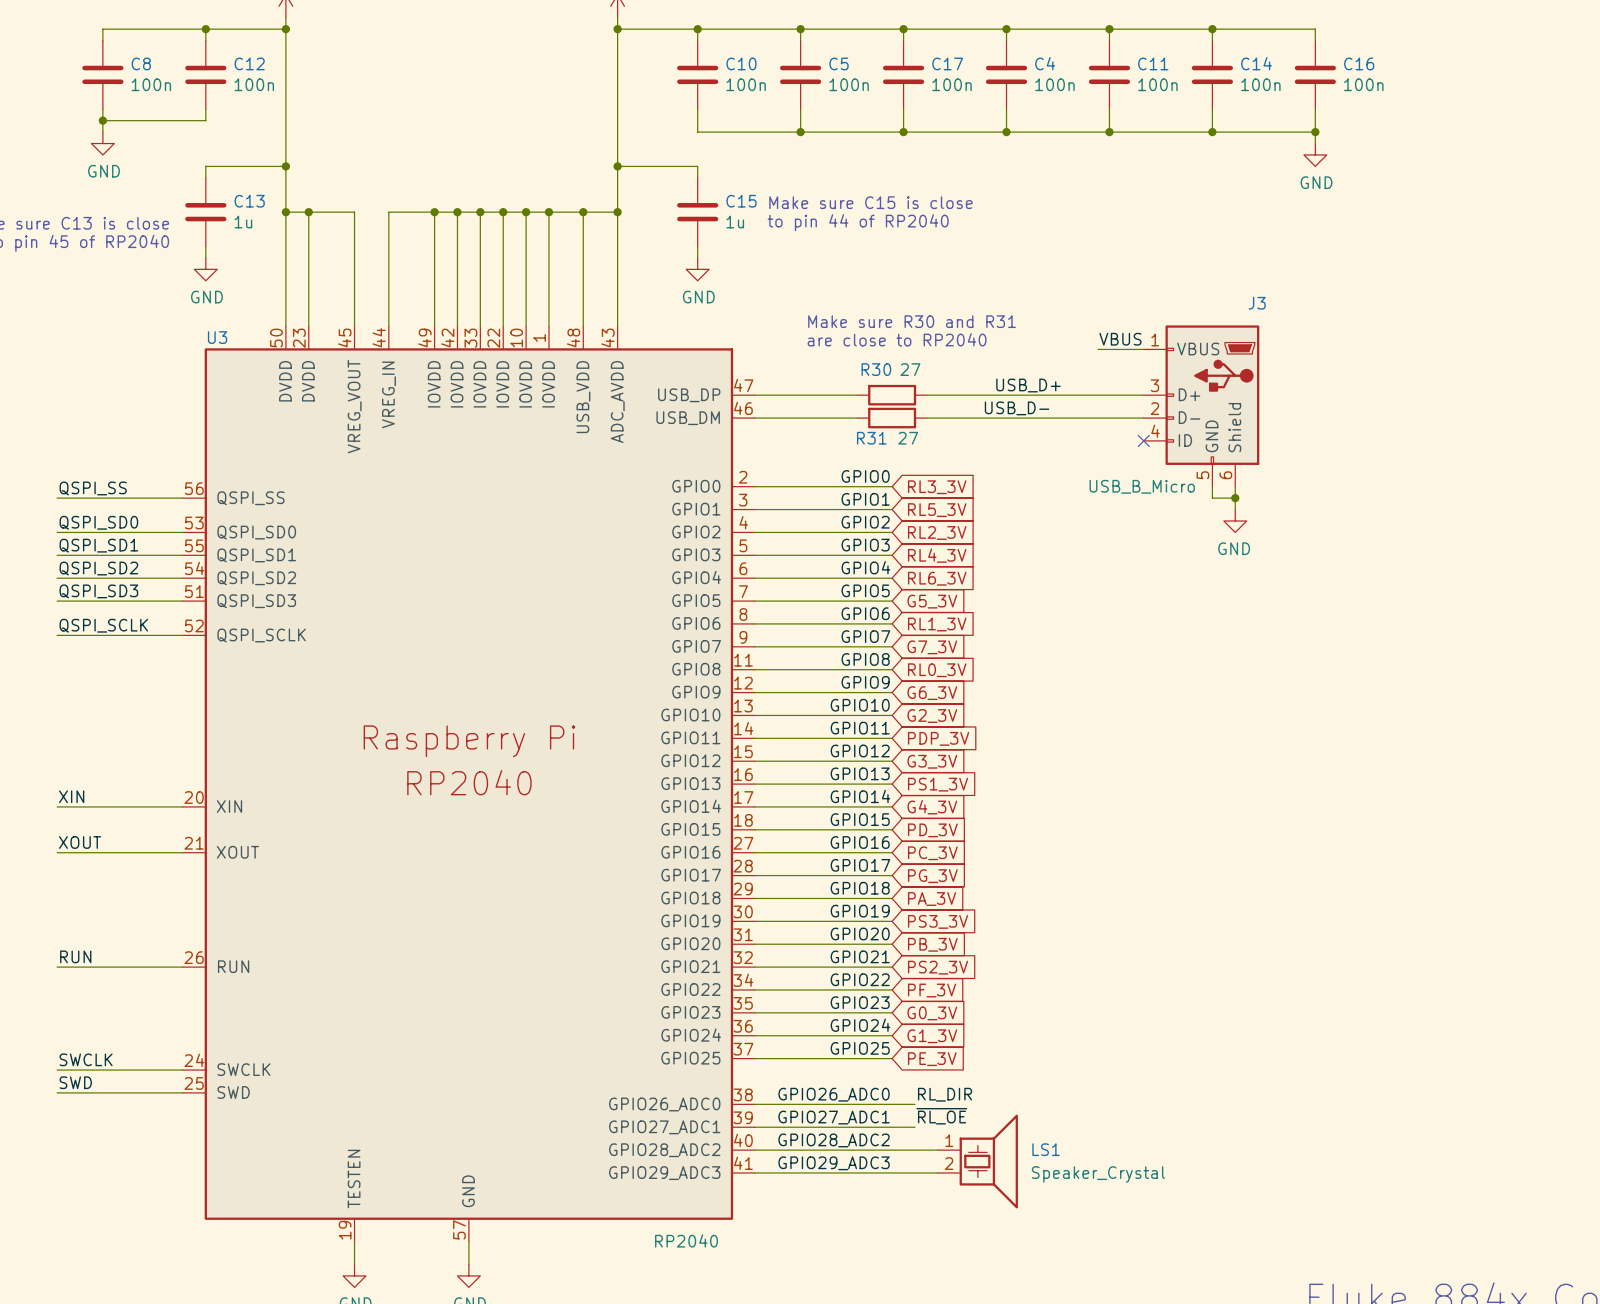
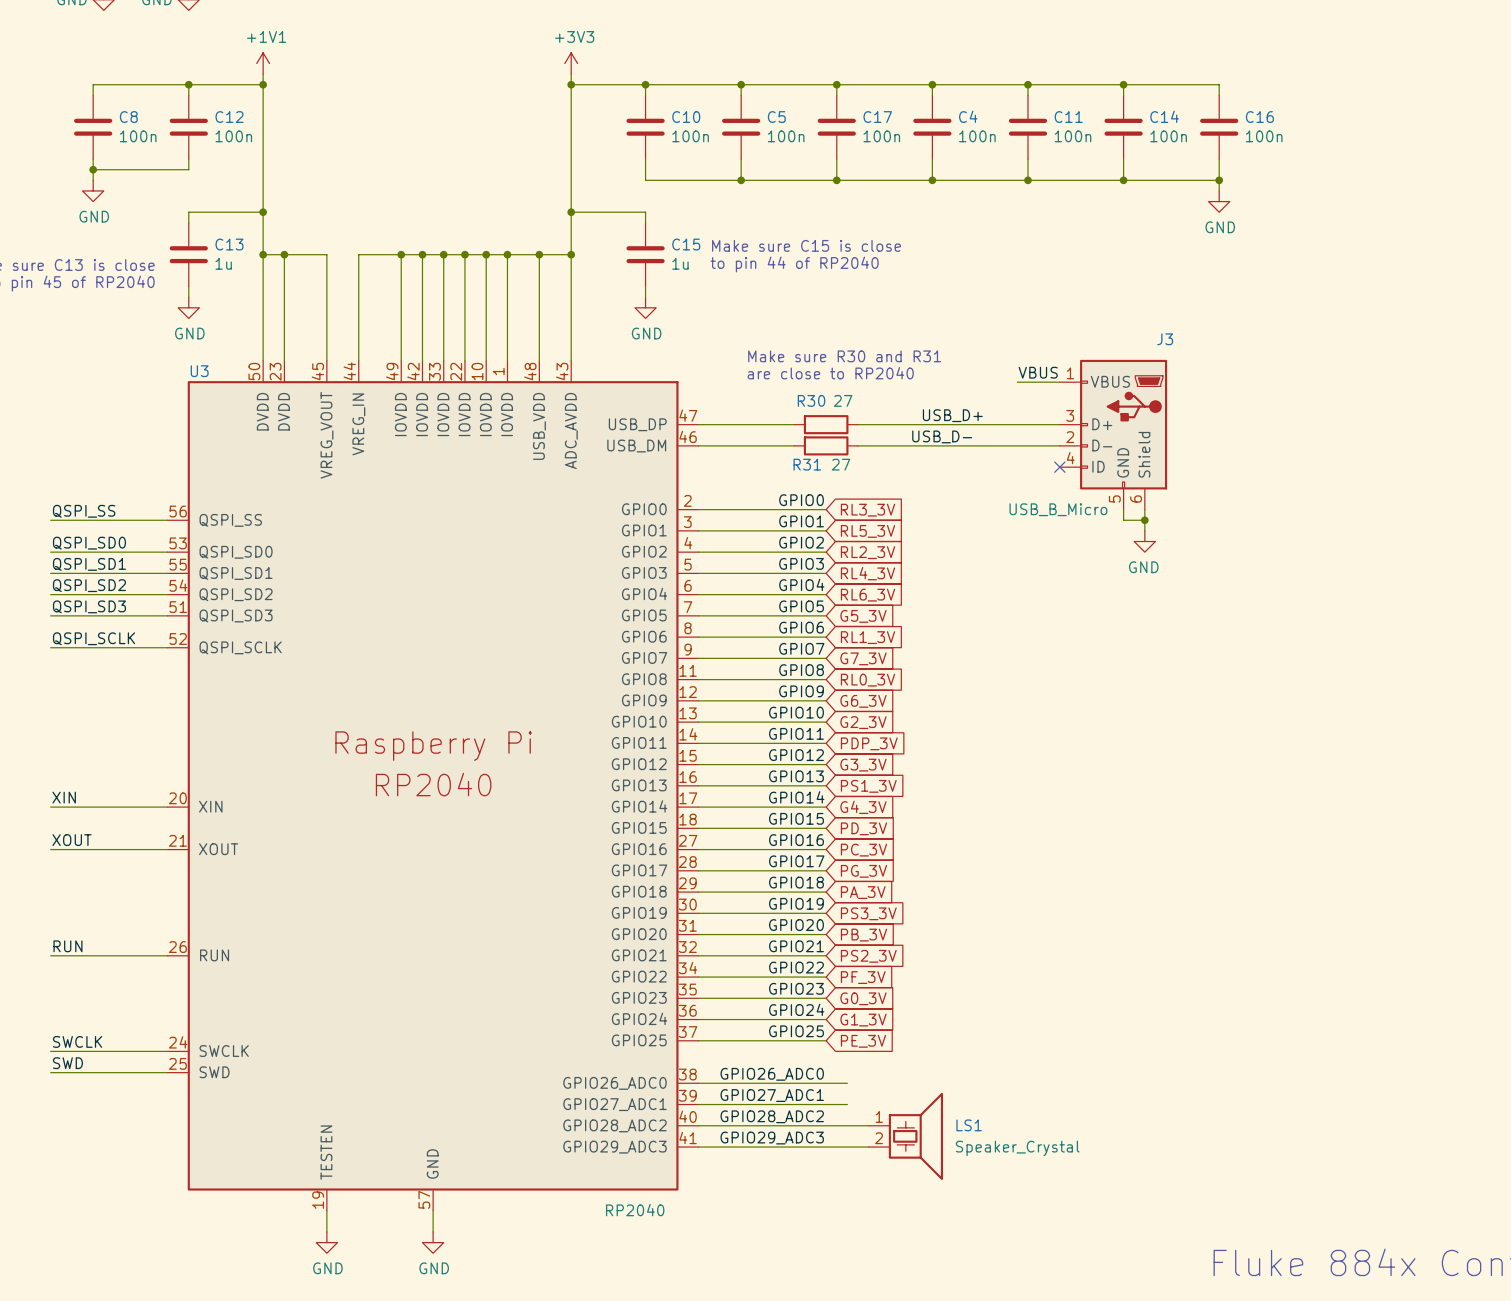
label: RL_DIR (945, 1094) -> none
label: ~{RL_OE} (941, 1116) -> none

